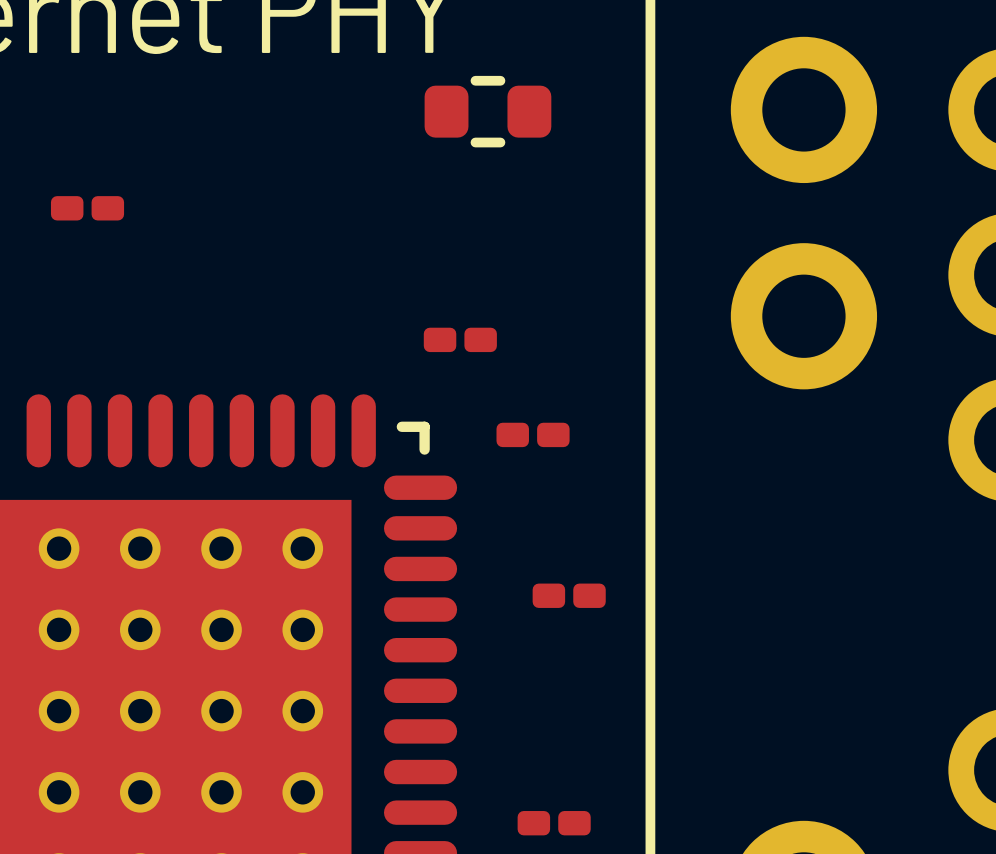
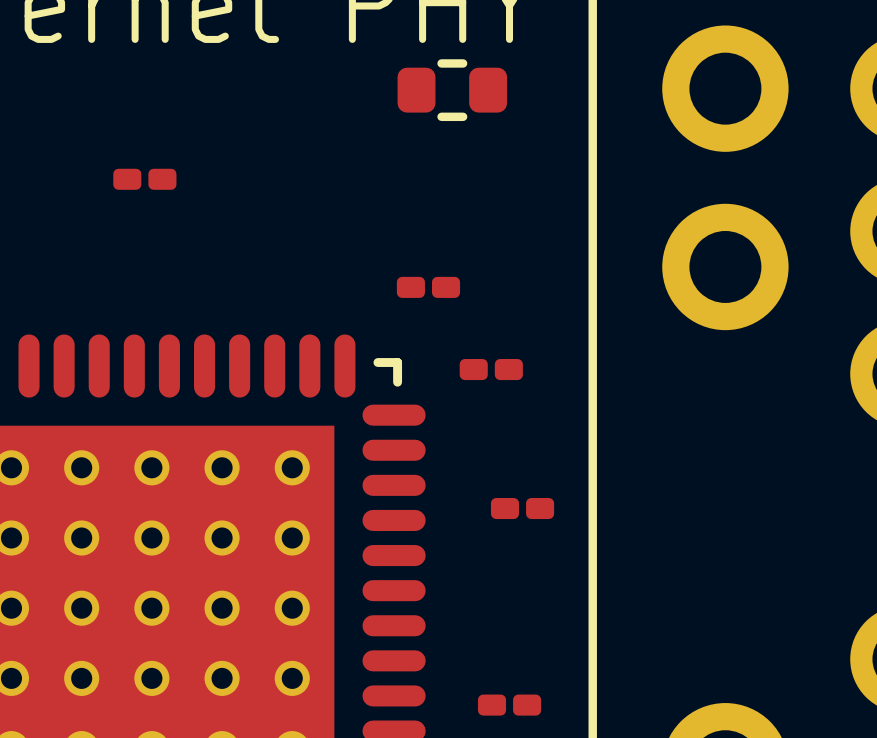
part position: (87, 208) -> (144, 179)

